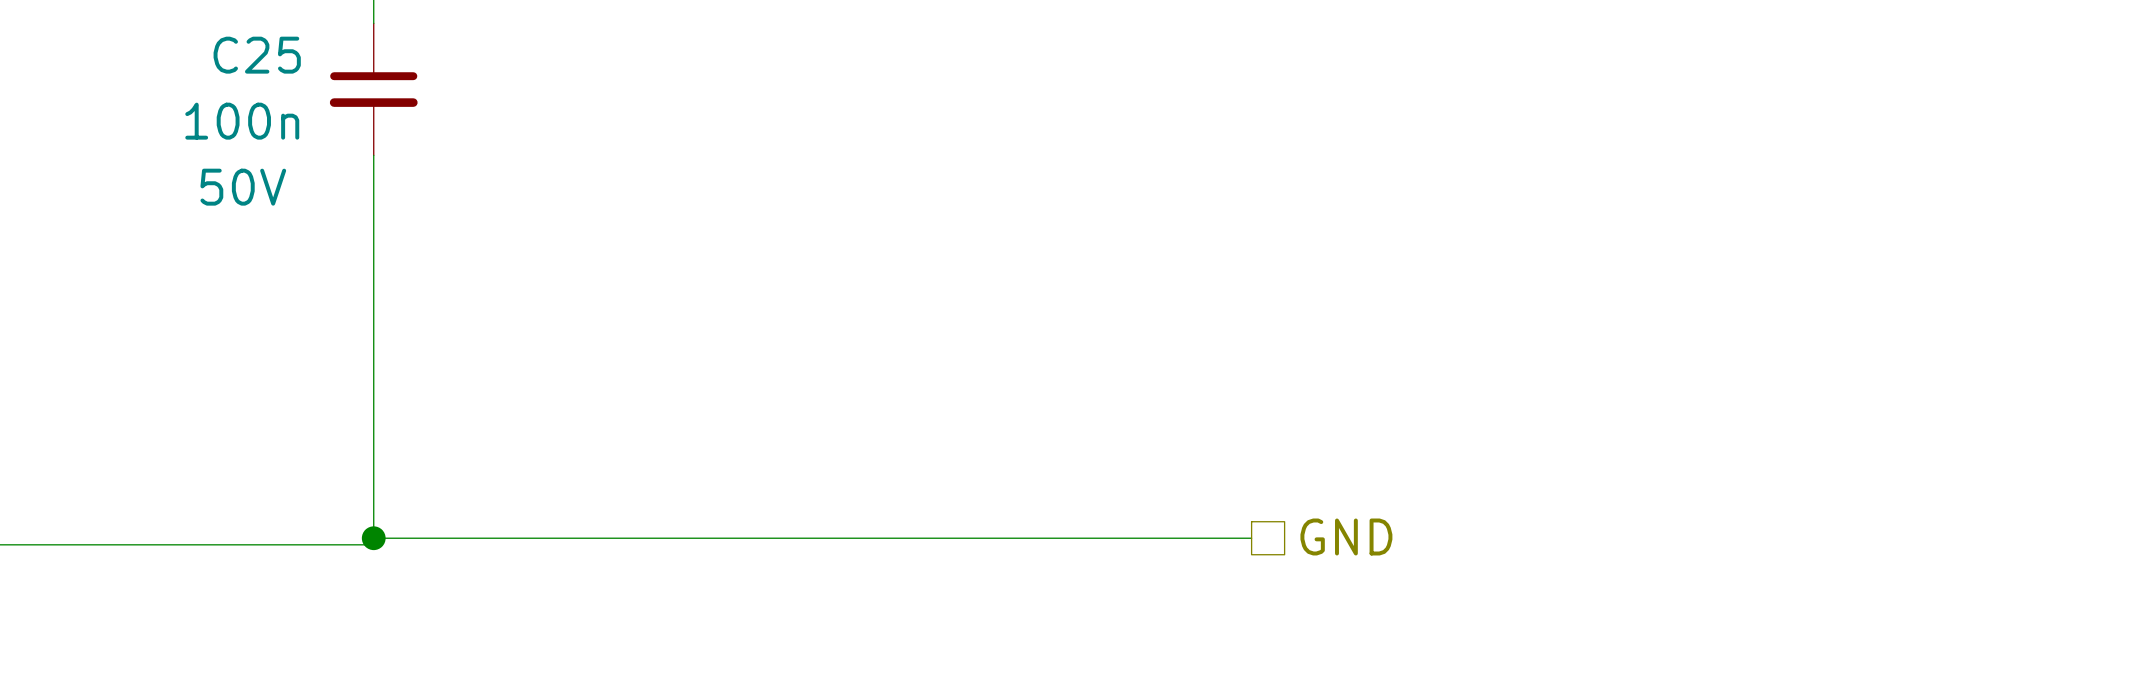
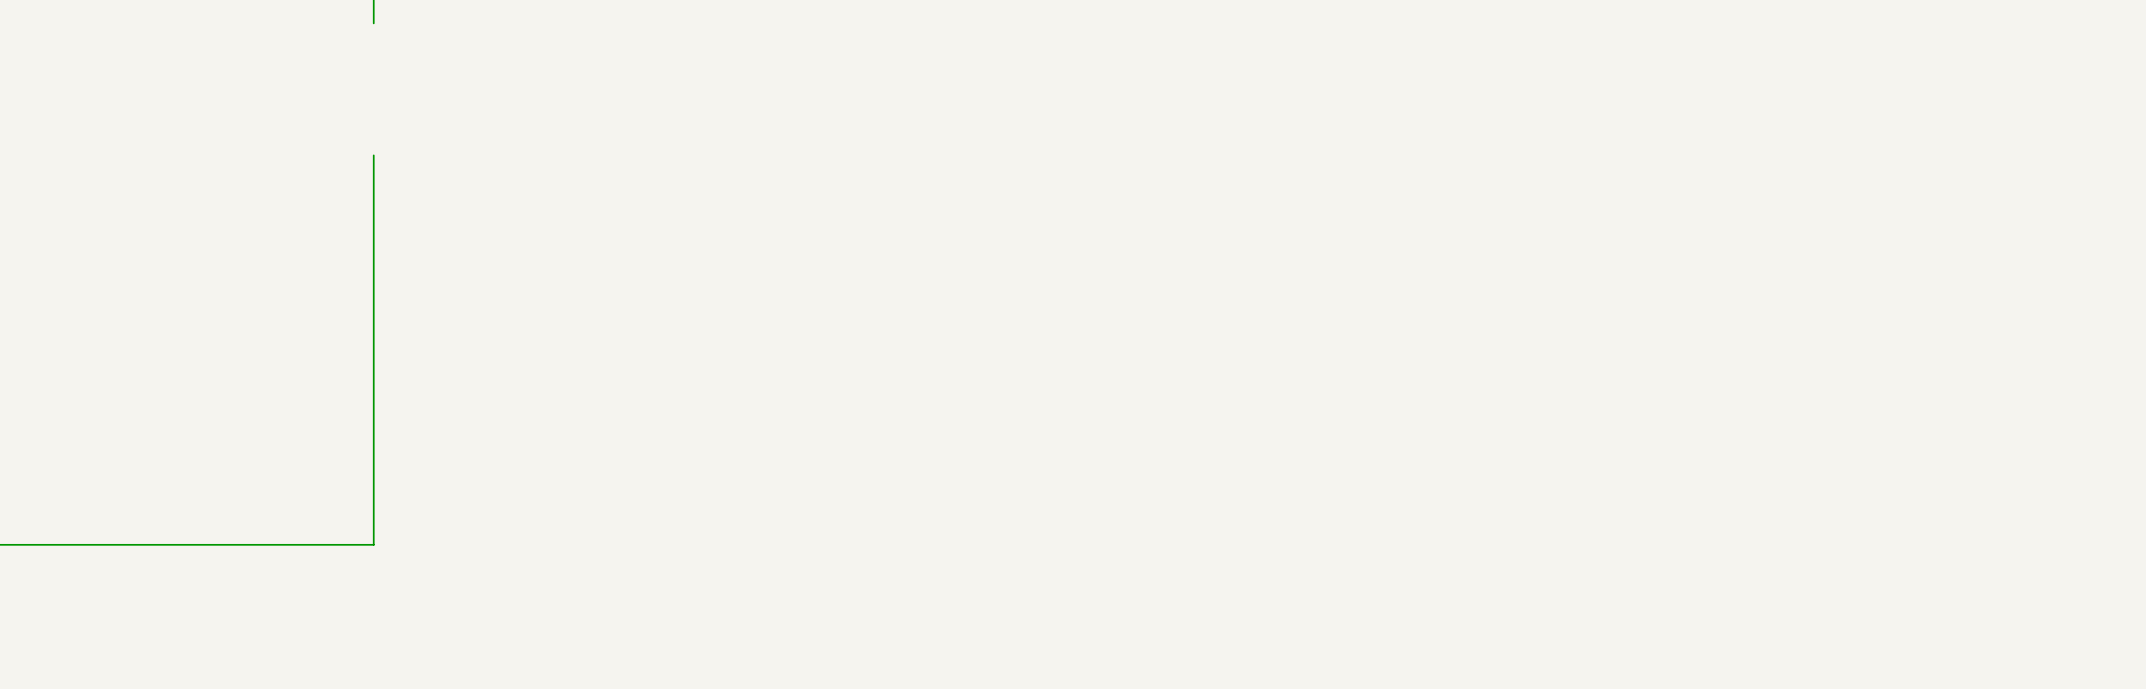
C25: 100n (373, 89) -> none
hierarchical label: GND (1346, 536) -> none
wire: (373, 538) (1251, 538) -> none
junction: (373, 538) -> none

